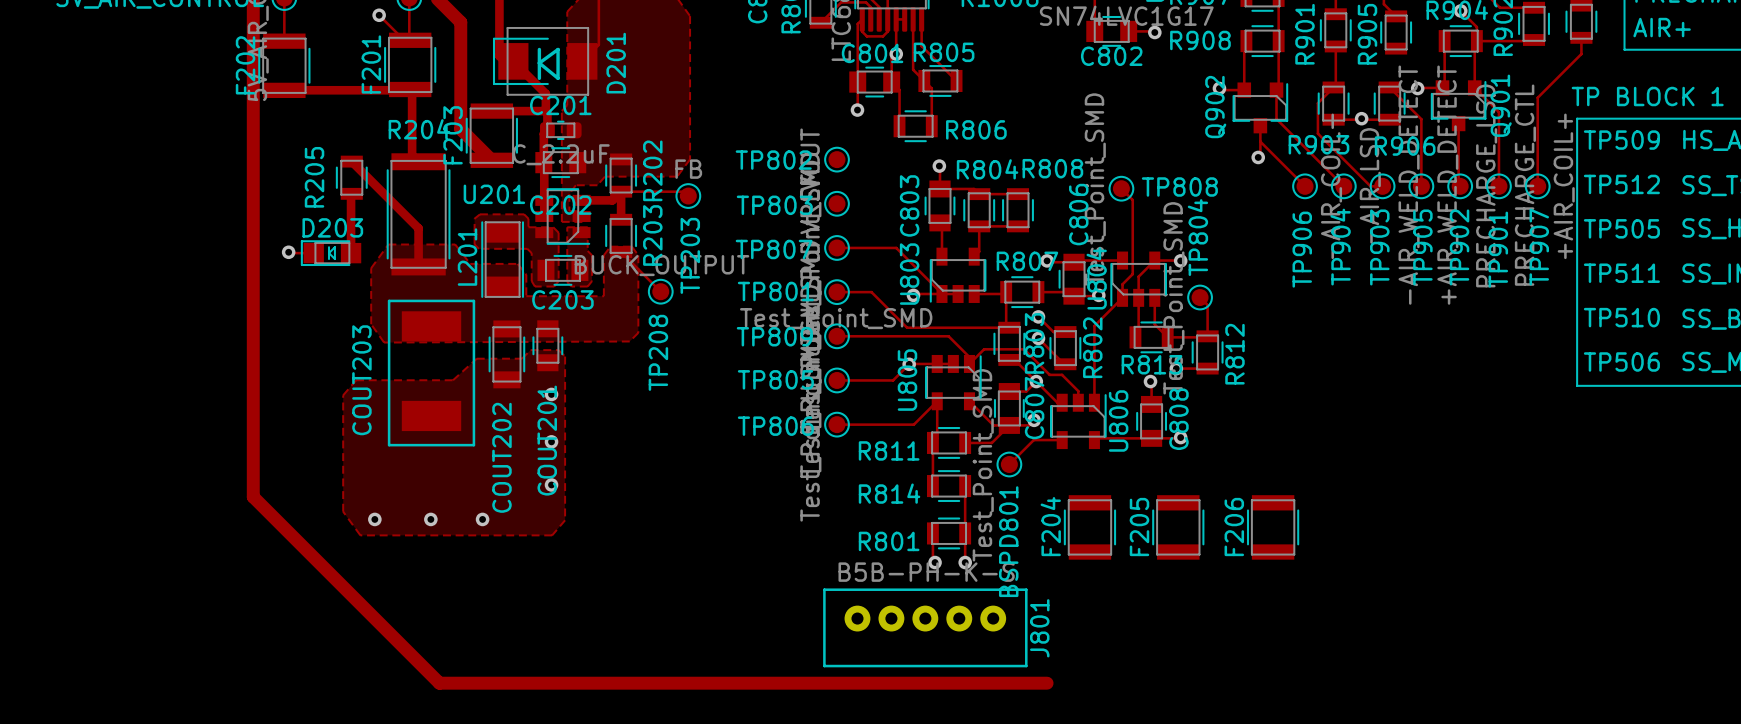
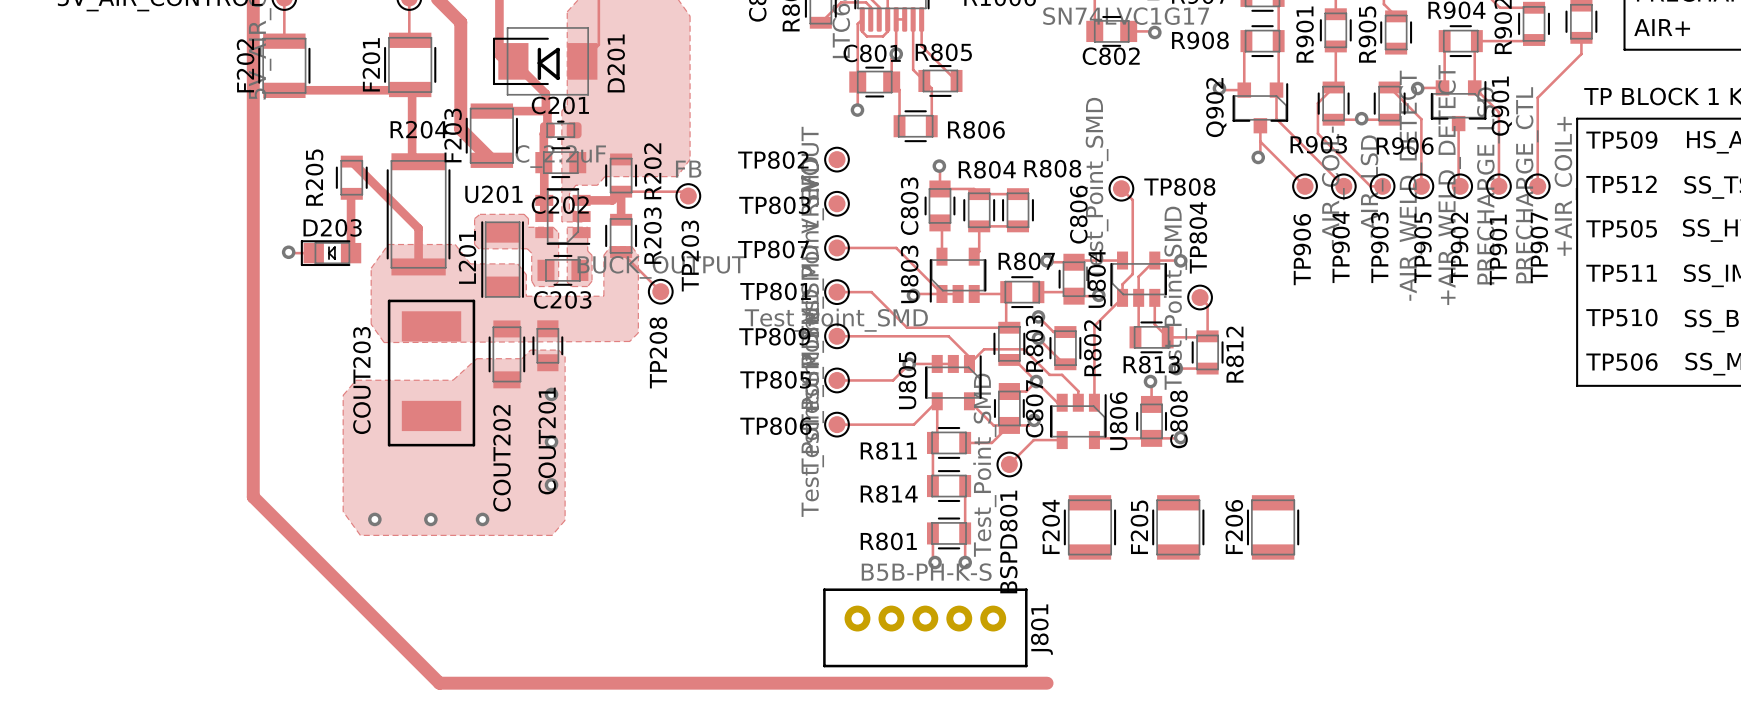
track: (1460, 10) (1476, 27) (1476, 41) -> none
via: (1460, 10) -> none
track: (379, 15) (404, 40) (410, 40) -> none
via: (379, 15) -> none

